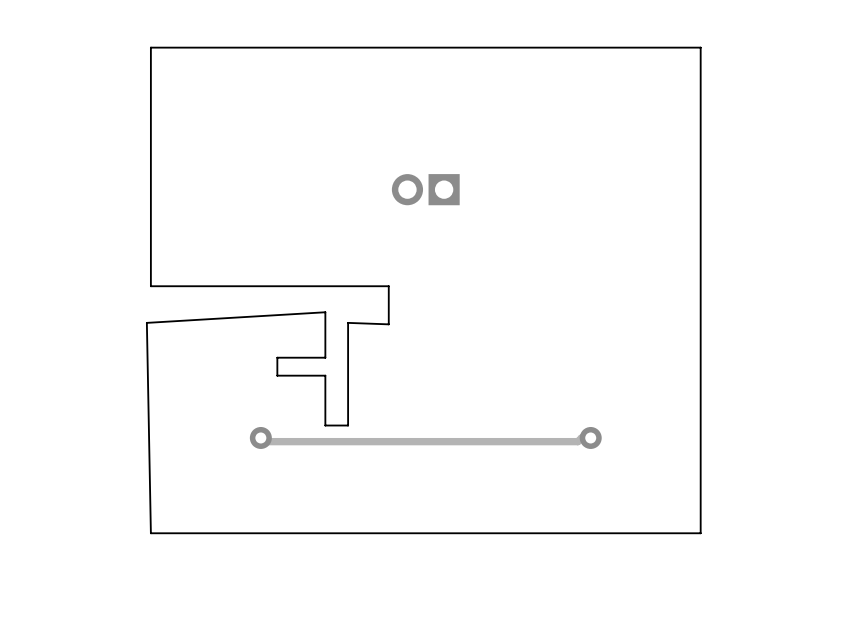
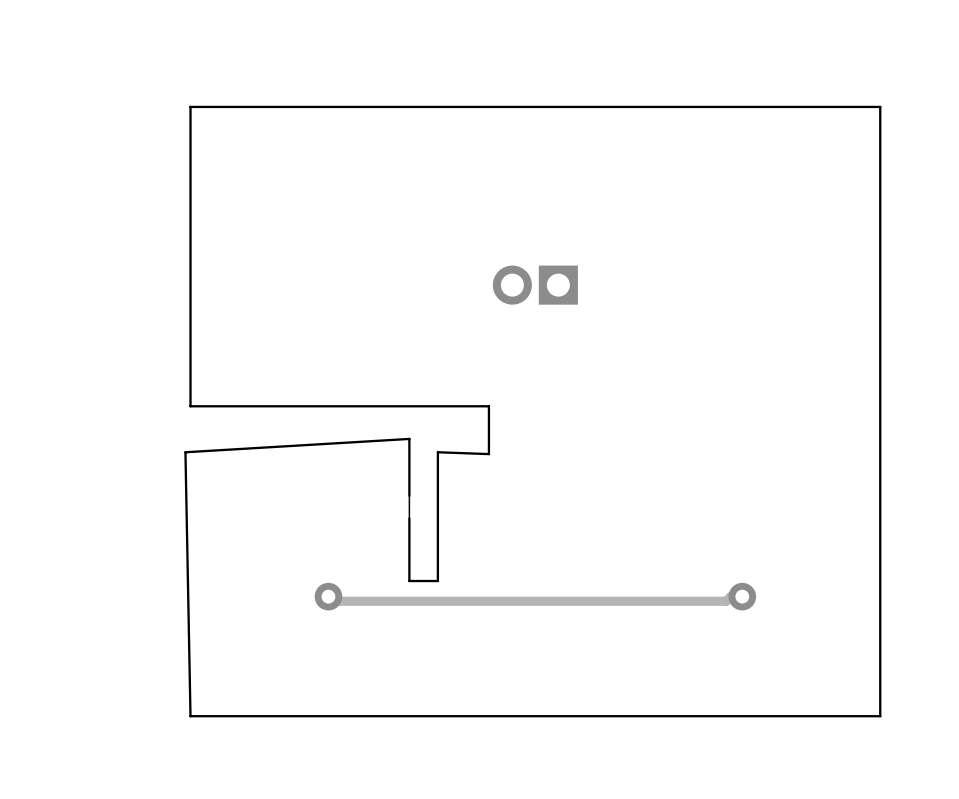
board edge: (325, 357) (277, 357) (277, 375) (325, 375) -> (409, 495) (409, 518)

